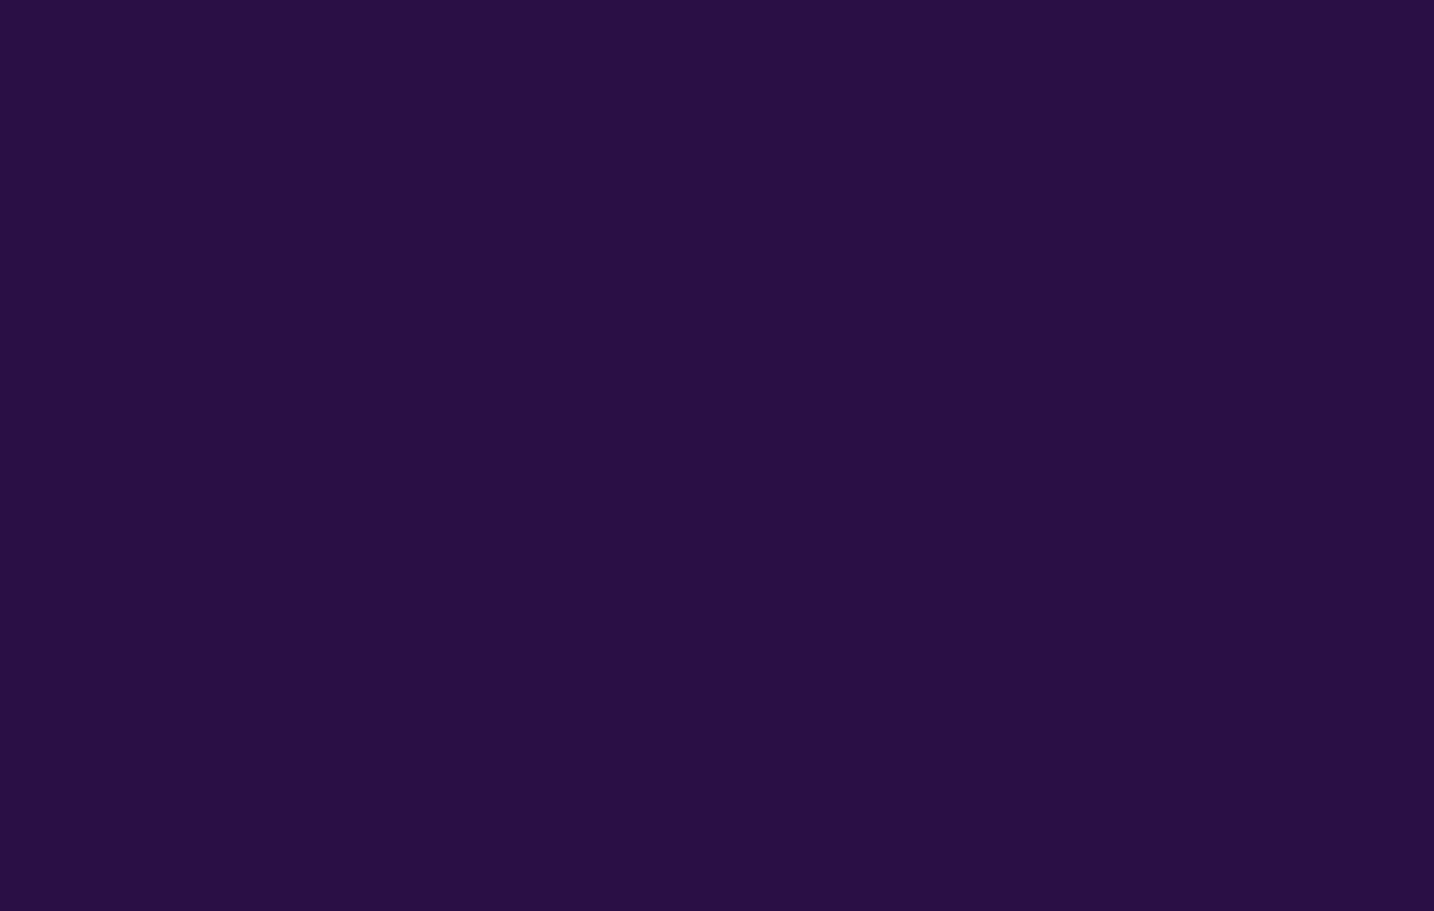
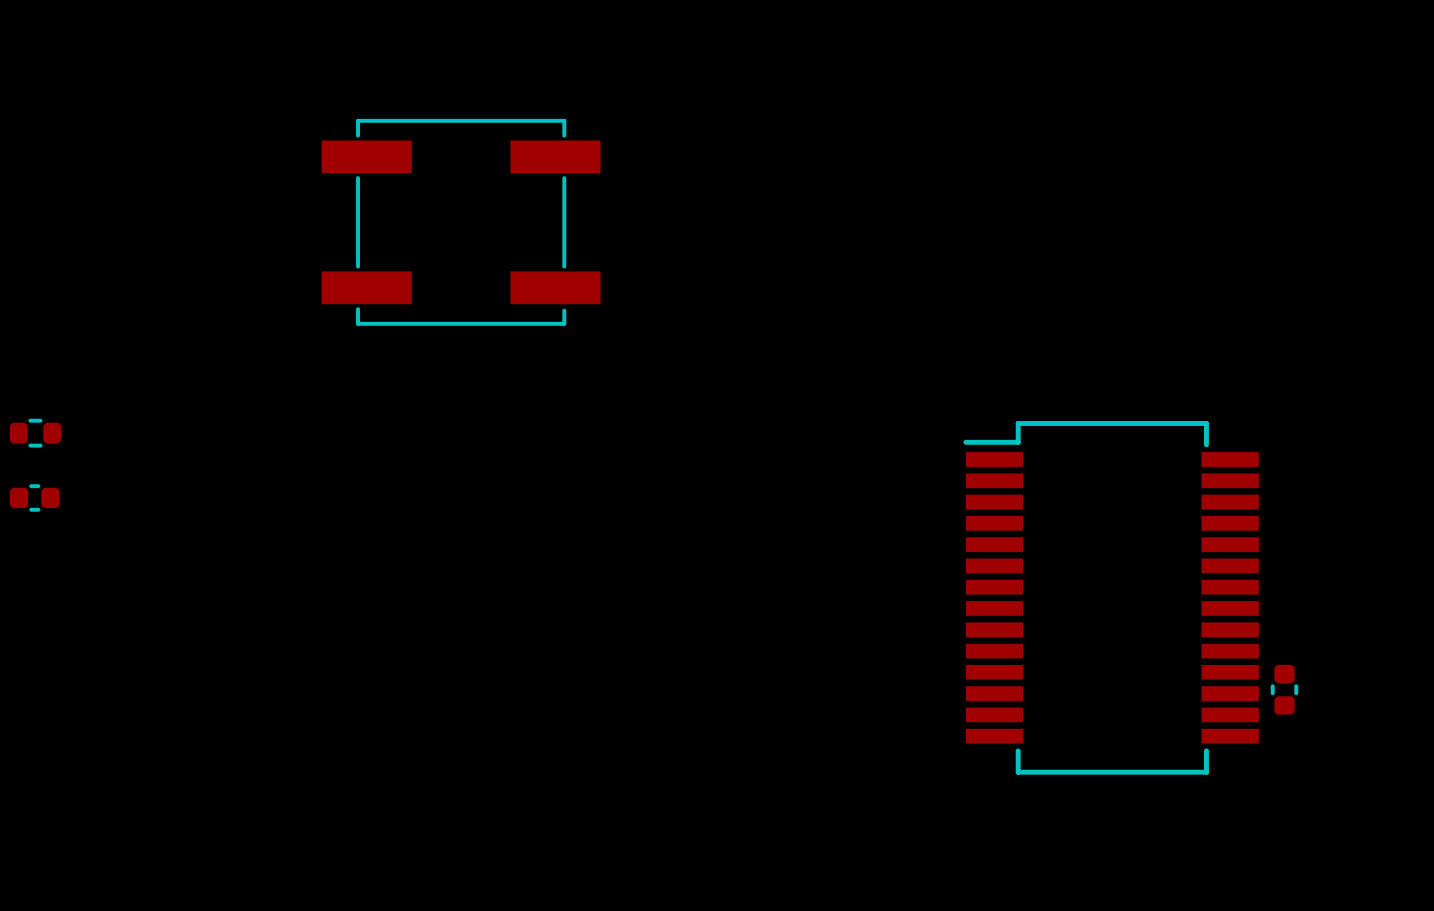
part: none -> (461, 222)
part: none -> (35, 433)
part: none -> (34, 497)
part: none -> (1111, 597)
part: none -> (1284, 689)

